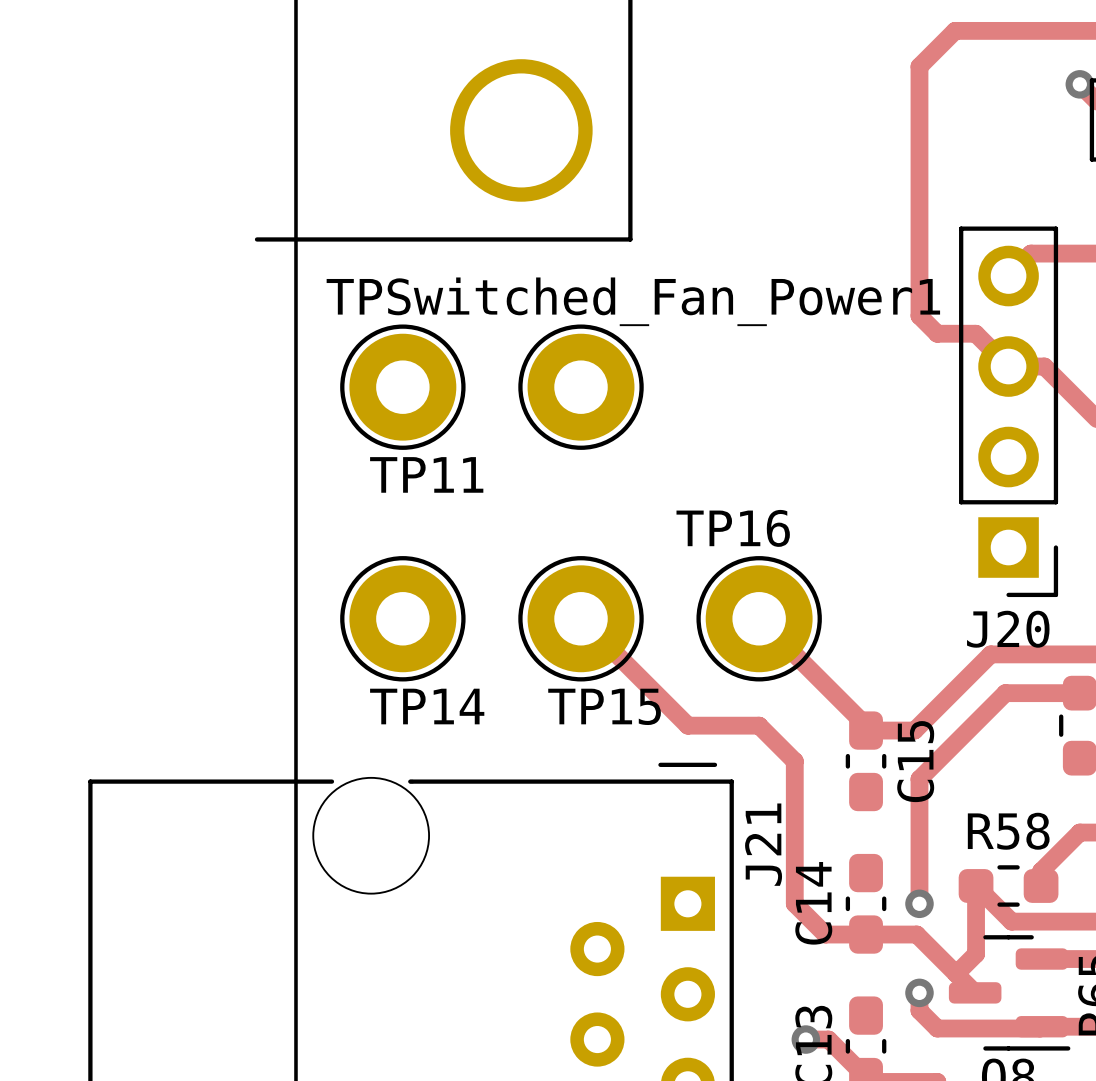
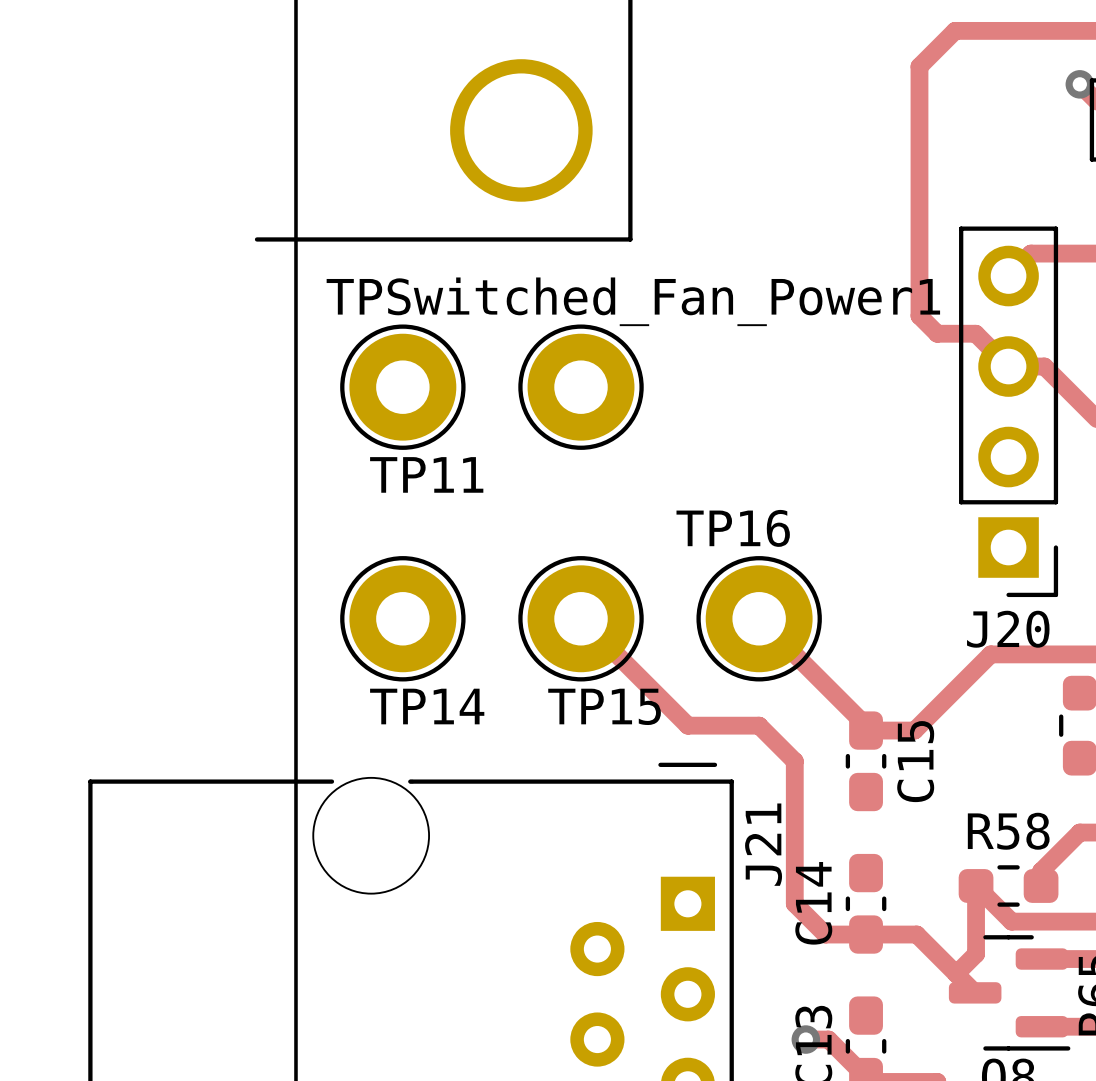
track: (1079, 693) (1005, 693) (919, 779) (919, 903) -> none
via: (919, 903) -> none
track: (919, 992) (919, 1010) (937, 1028) (1040, 1028) (1041, 1026) -> none
via: (919, 992) -> none

